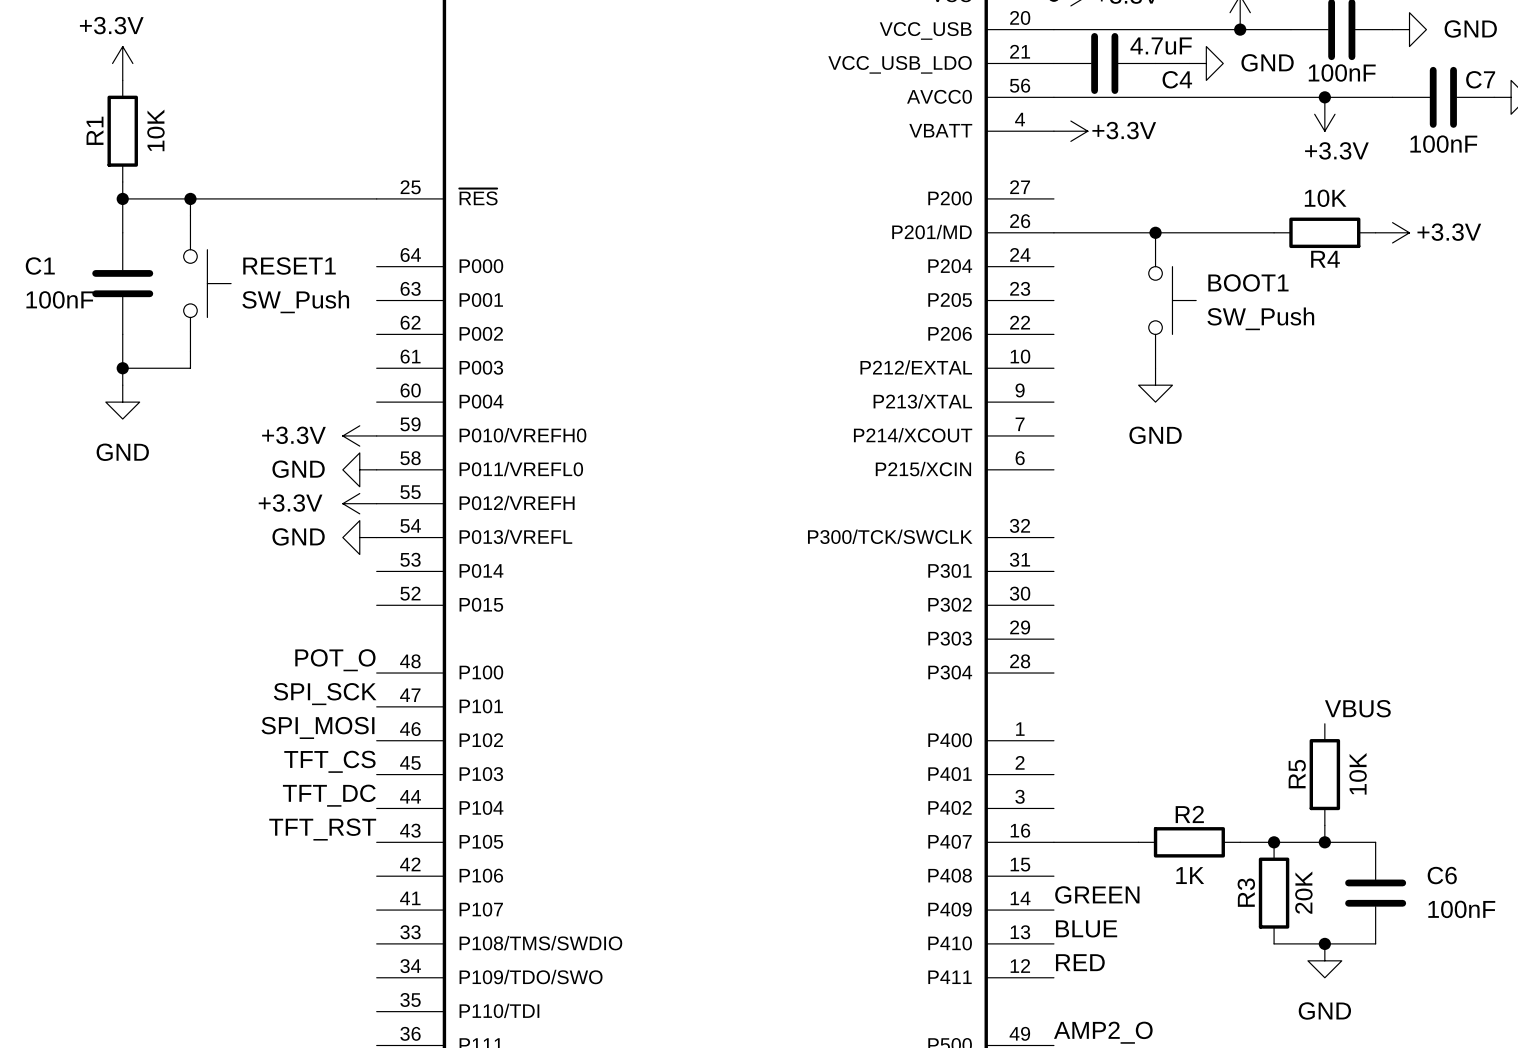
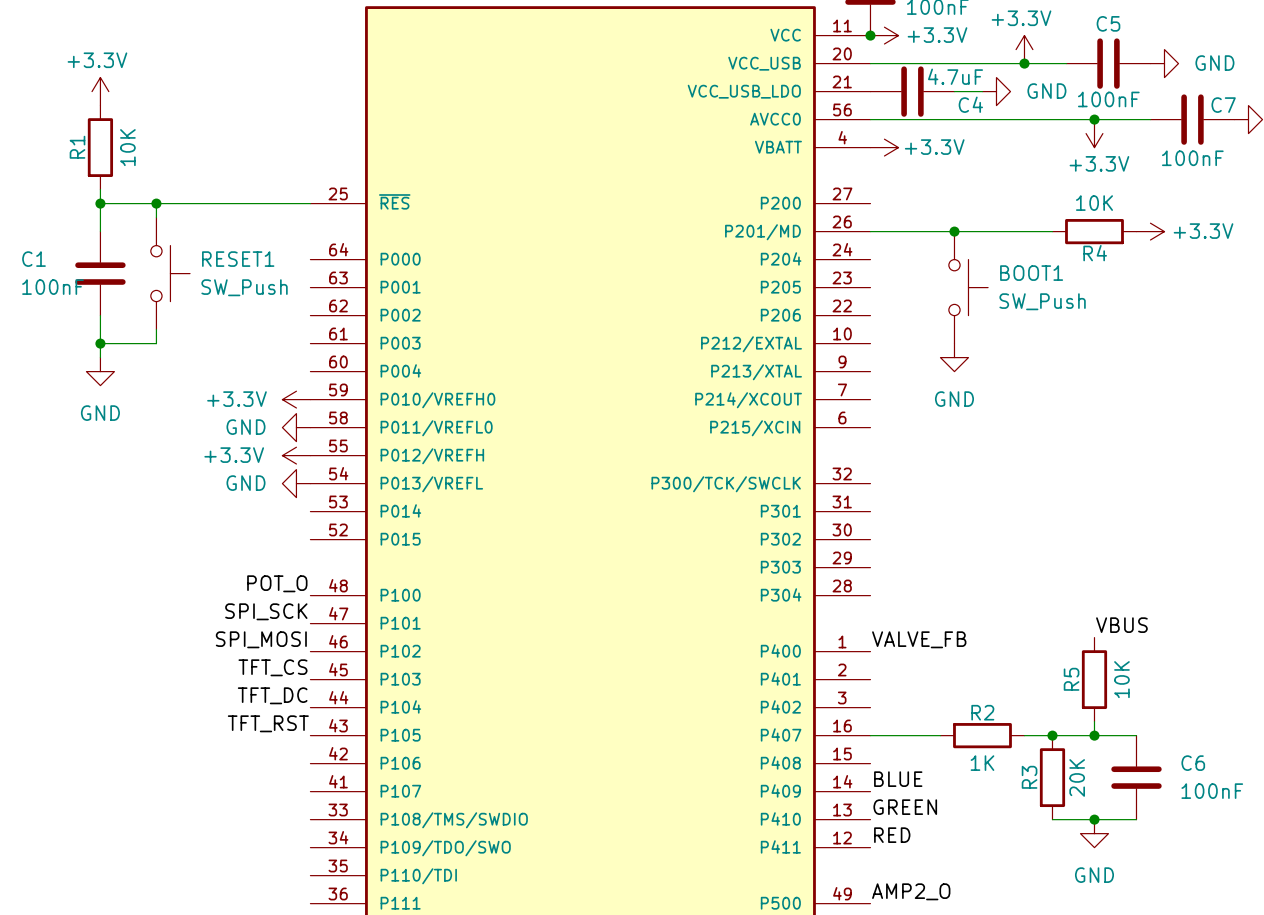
label: none -> VALVE_FB (919, 639)
label: GREEN (1097, 894) -> BLUE (898, 779)
label: BLUE (1086, 928) -> GREEN (905, 807)

